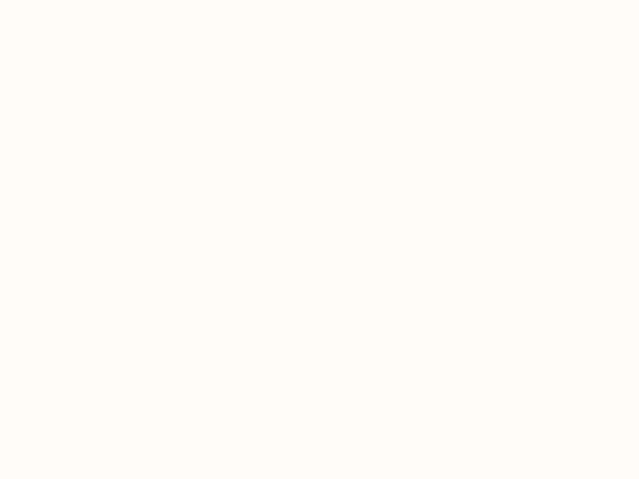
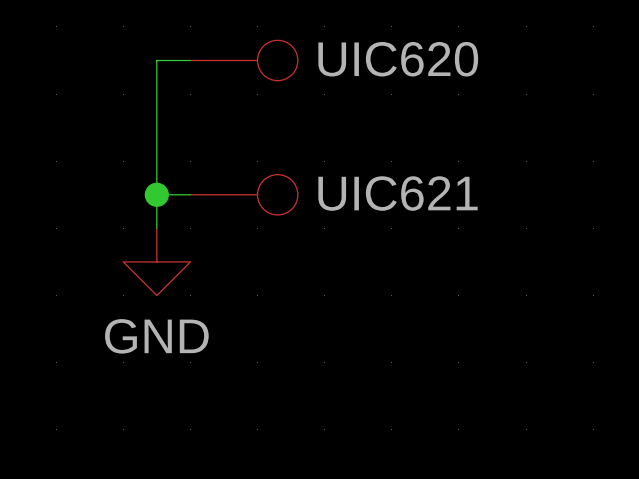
wire: none -> (190, 60) (156, 60) (156, 228)
UIC620: none -> (244, 60)
wire: none -> (156, 194) (190, 194)
junction: none -> (156, 194)
UIC621: none -> (244, 194)
power symbol: none -> GND (156, 261)

